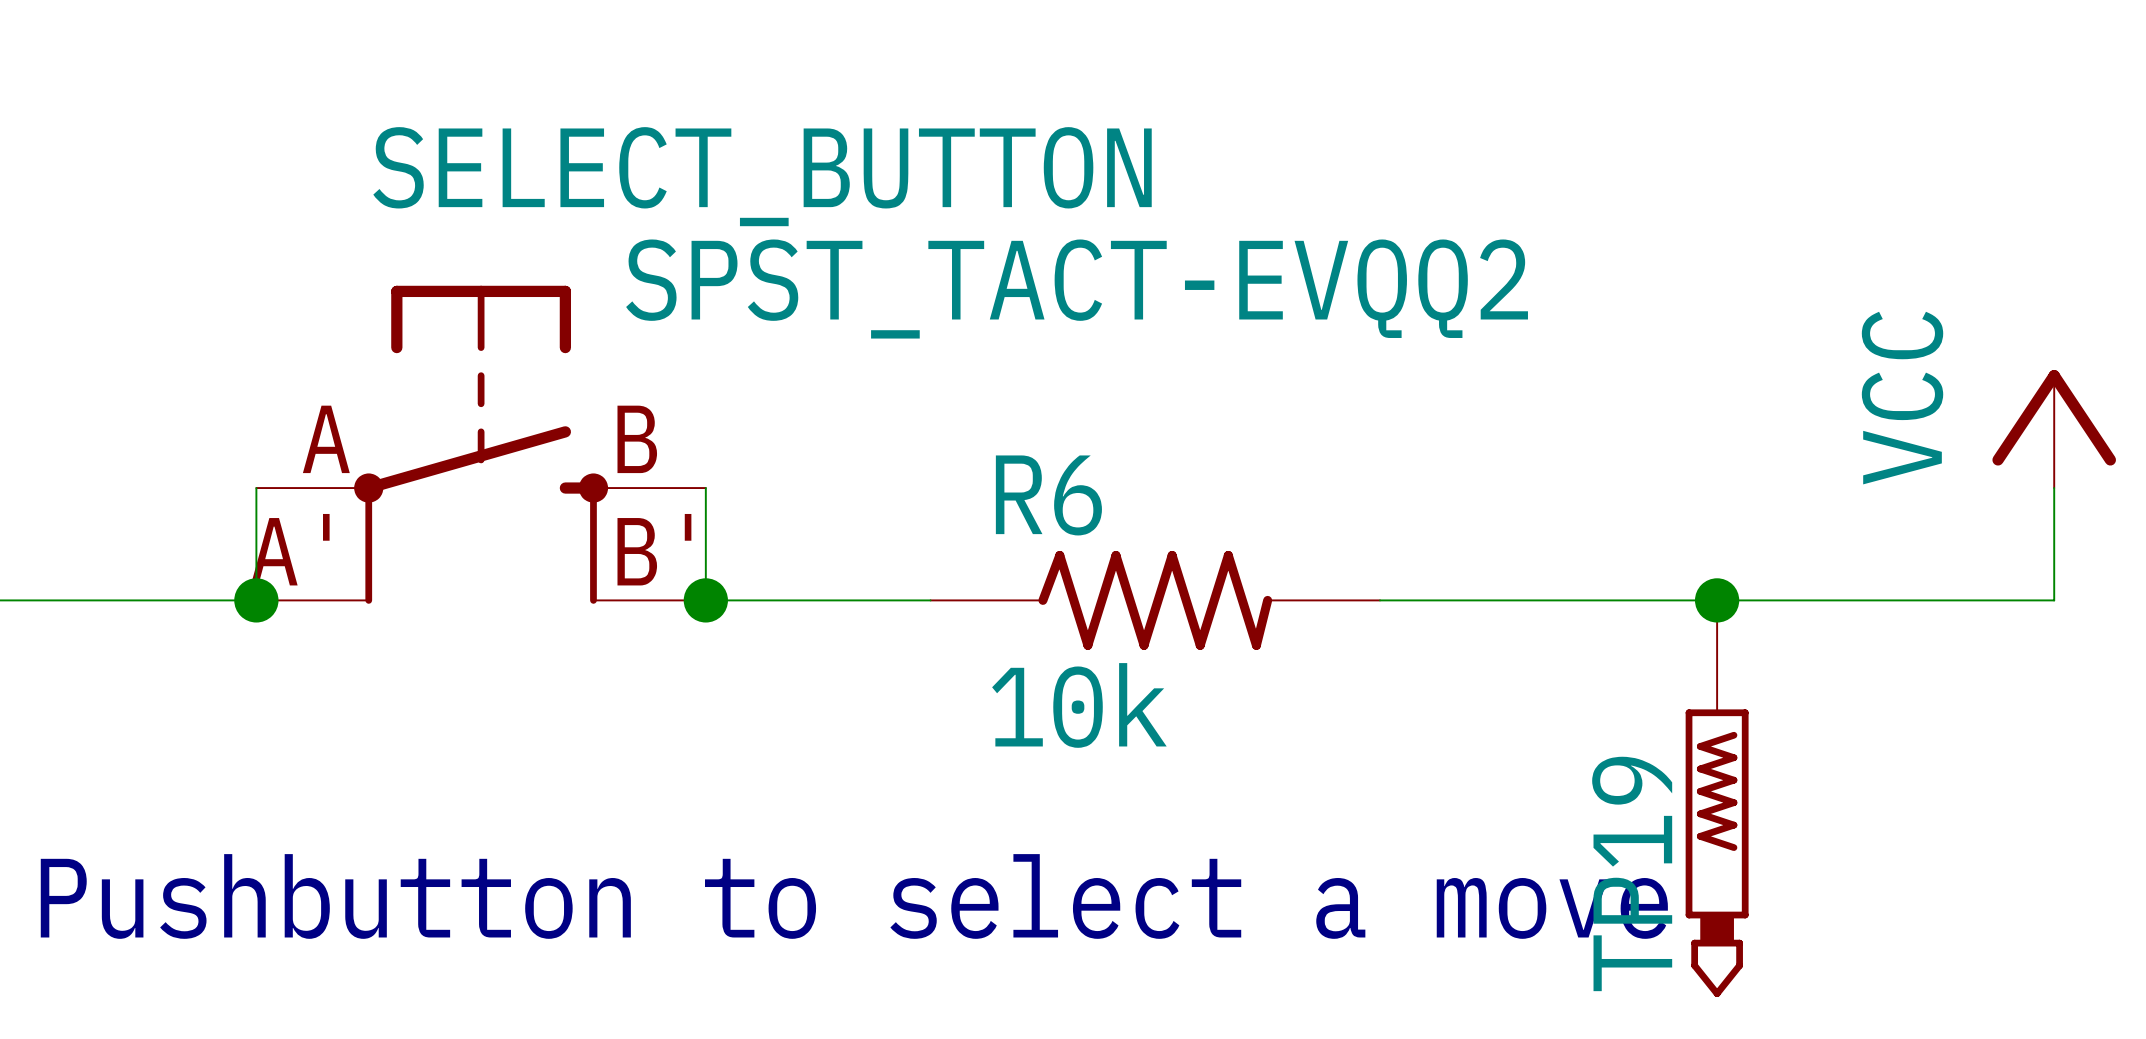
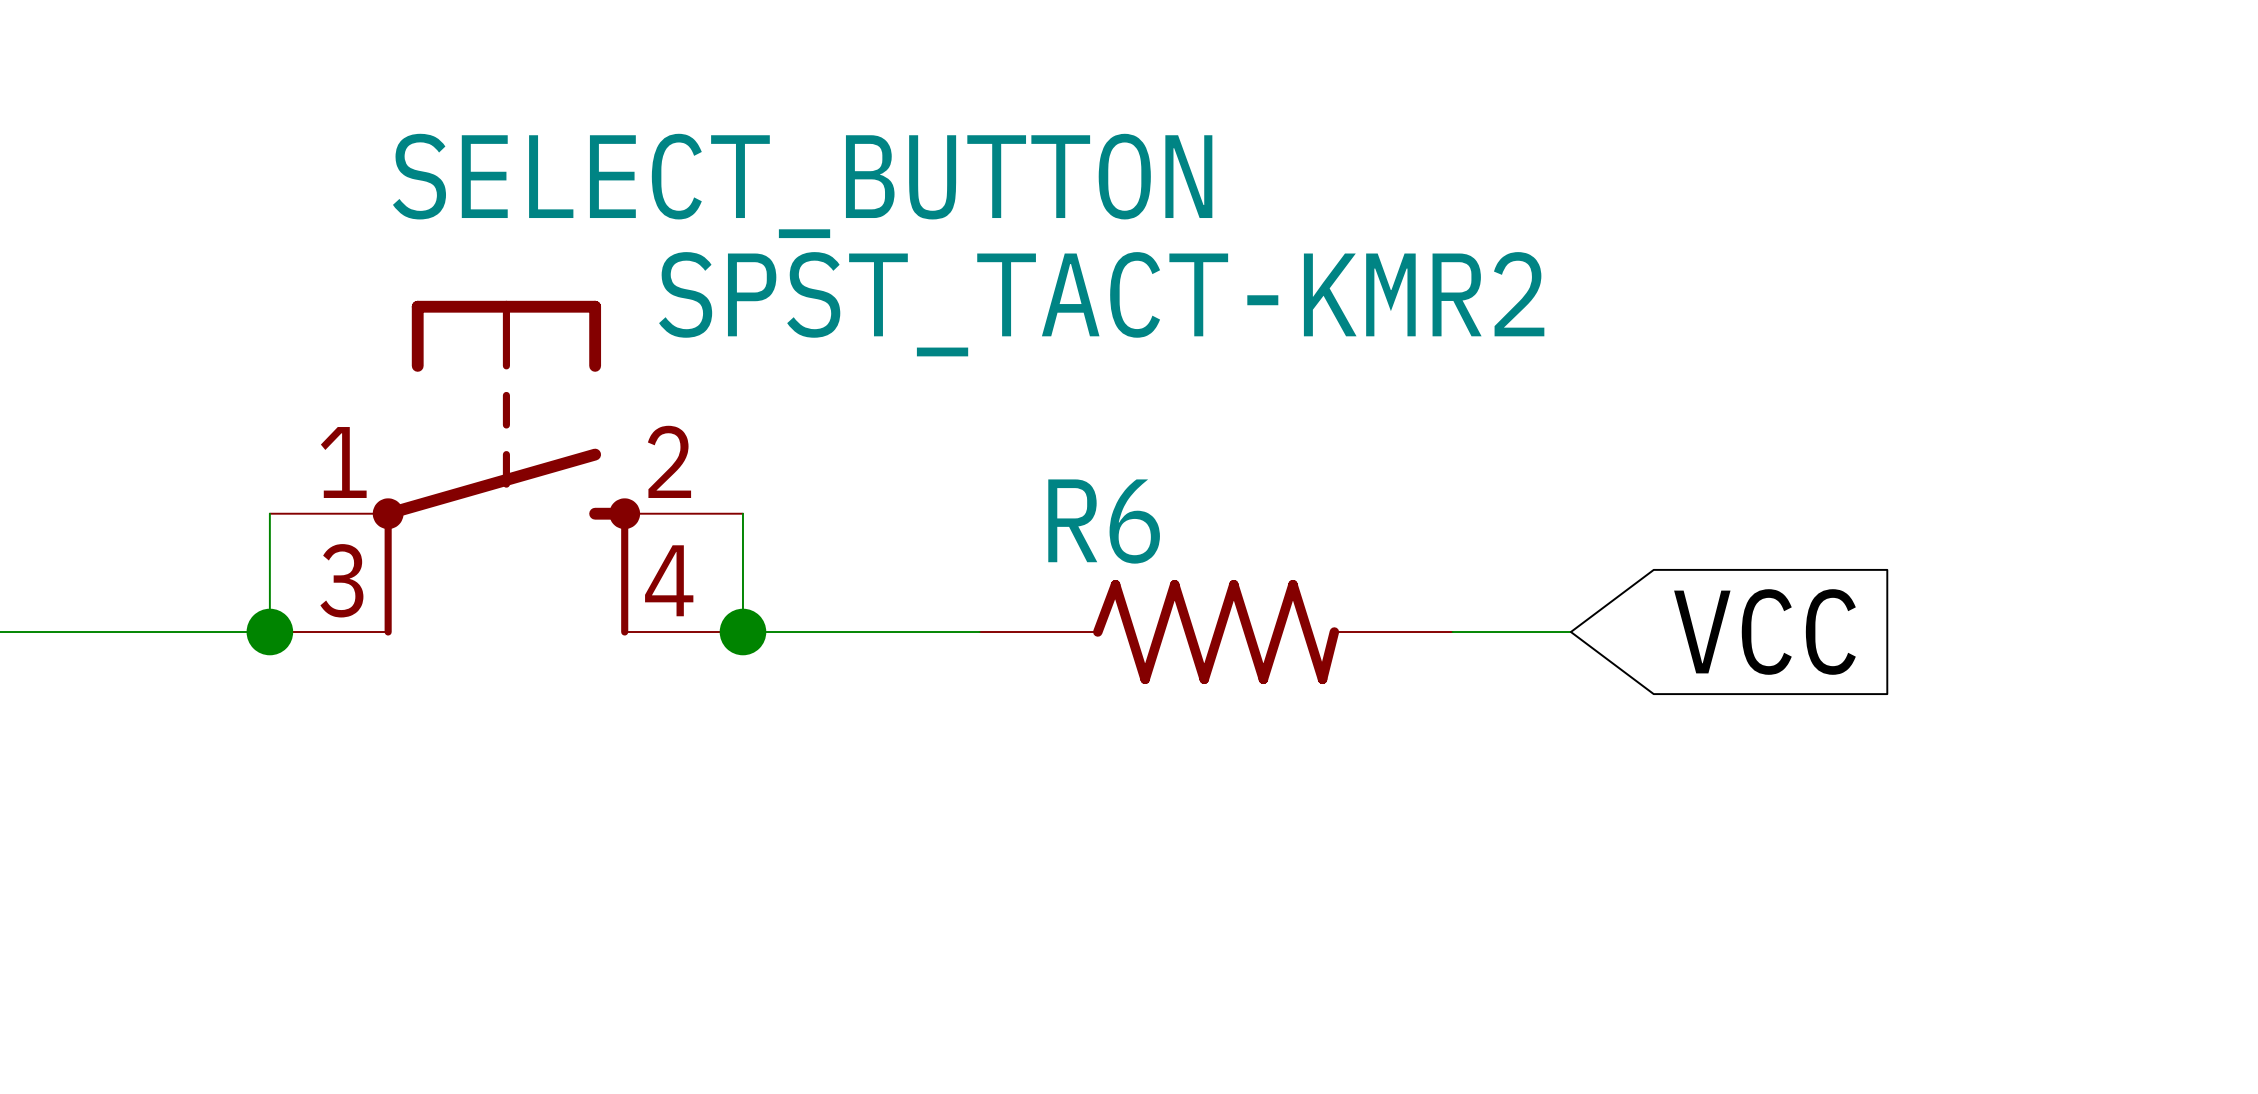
SELECT_BUTTON value: SPST_TACT-EVQQ2 (1077, 289) -> SPST_TACT-KMR2 (1101, 304)
power symbol: VCC (2054, 429) -> none
SELECT_BUTTON pin number: A (326, 439) -> 1 (343, 462)
SELECT_BUTTON pin number: B (637, 439) -> 2 (669, 461)
wire: (2054, 488) (2054, 600) (1492, 600) -> none
SELECT_BUTTON pin number: A' (290, 549) -> 3 (341, 580)
SELECT_BUTTON pin number: B' (654, 549) -> 4 (669, 580)
global label: none -> VCC (1764, 632)
junction: (1717, 600) -> none
R6 value: 10k (1079, 705) -> none
TP19: (1717, 798) -> none
text: Pushbutton to select a move (854, 896) -> none

